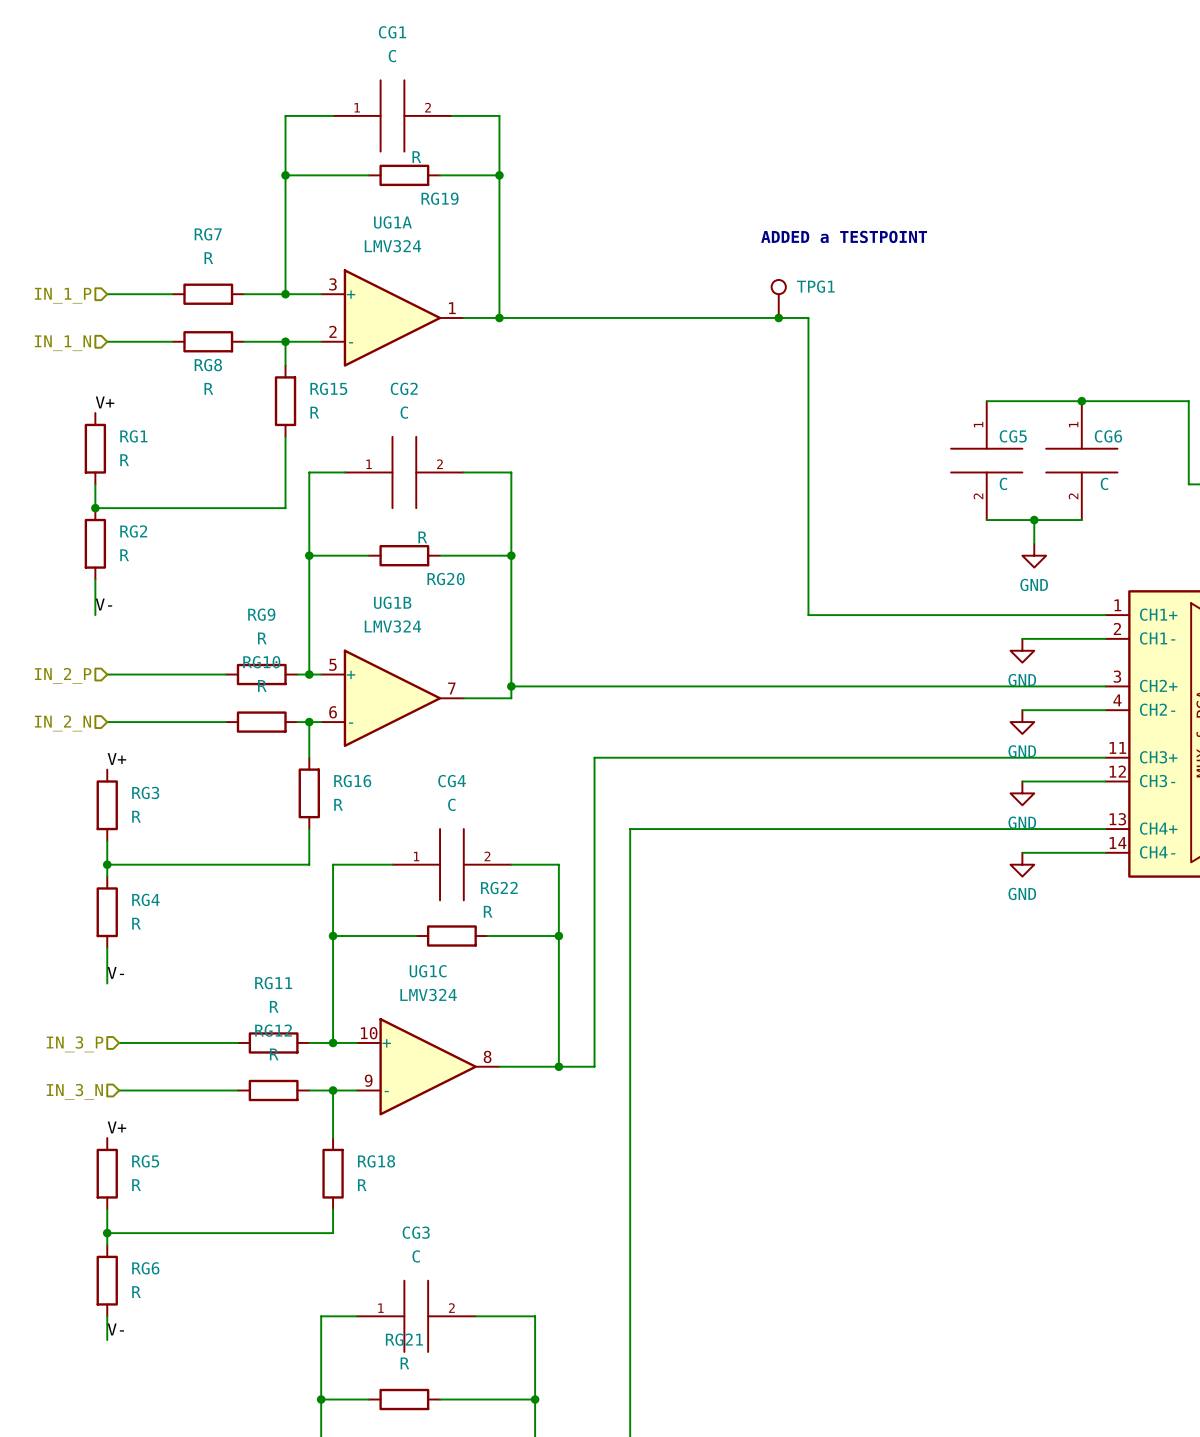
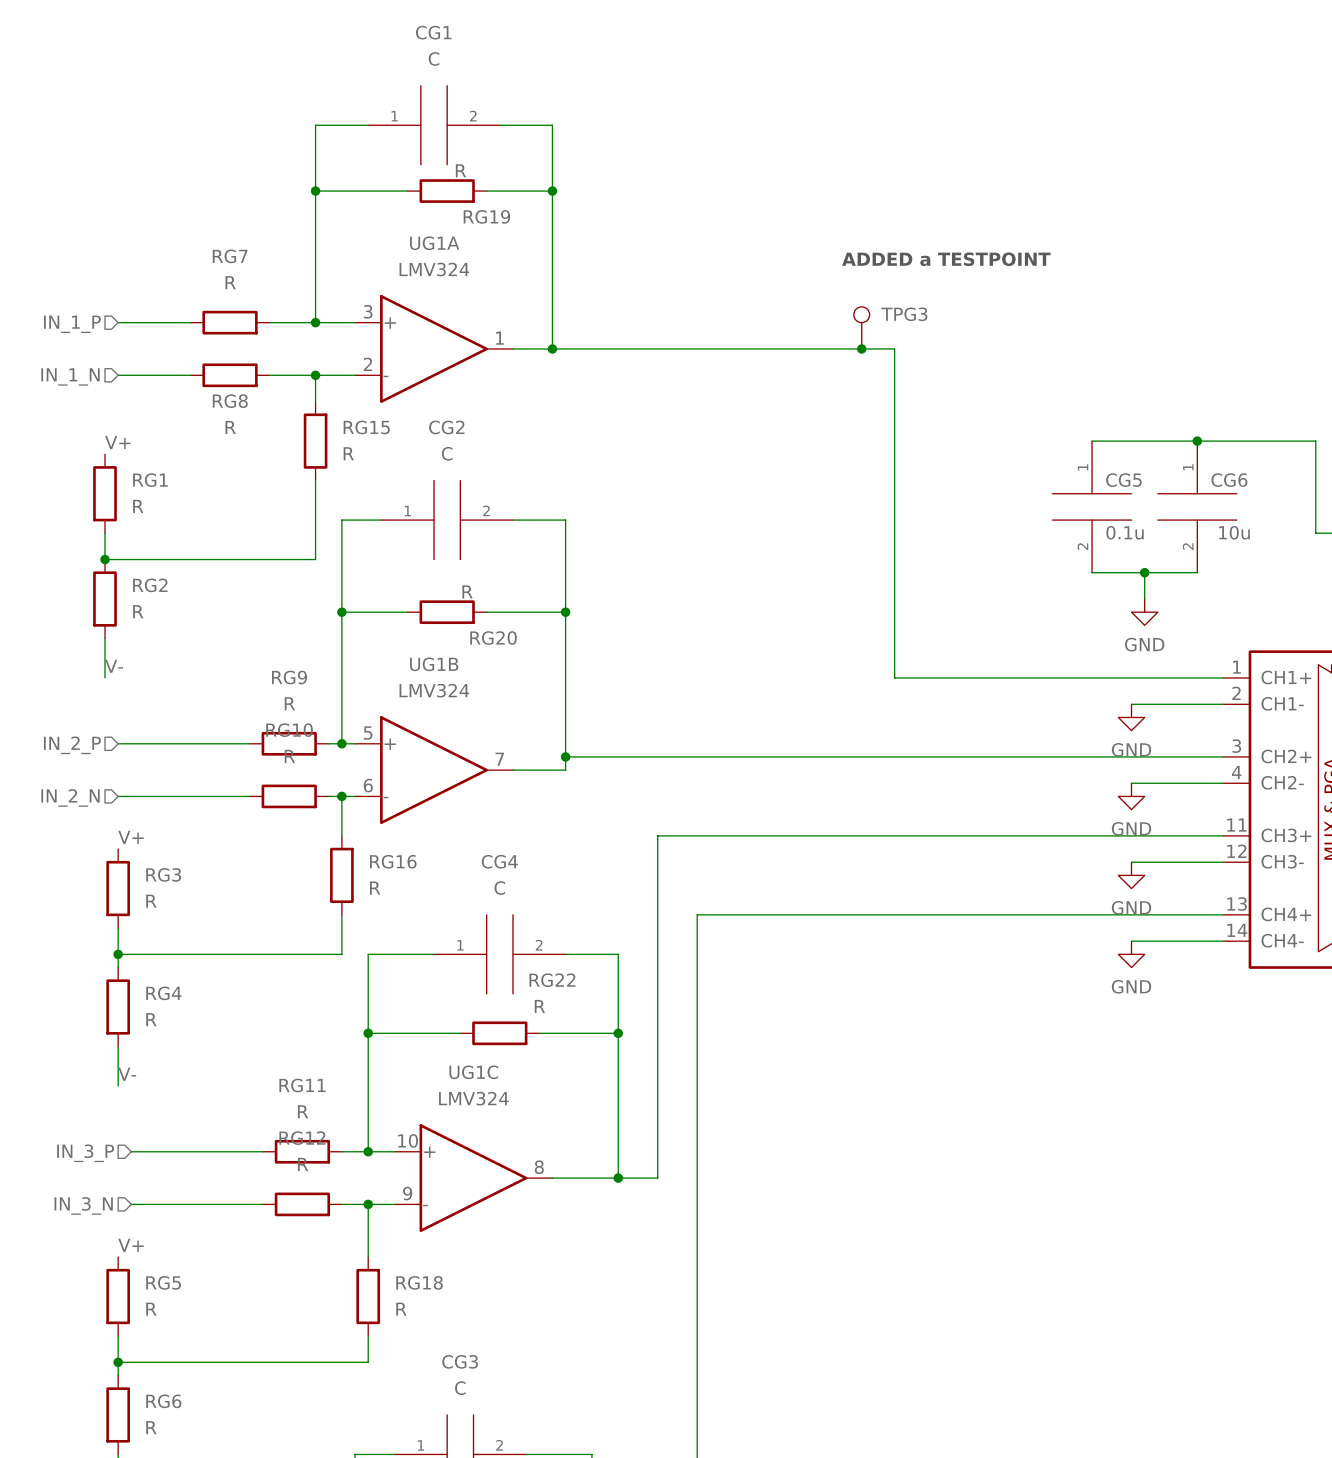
TPG1 name: TPG1 (815, 286) -> TPG3 (904, 314)
CG5 value: C (1003, 483) -> 0.1u (1125, 532)
CG6 value: C (1104, 483) -> 10u (1234, 532)

